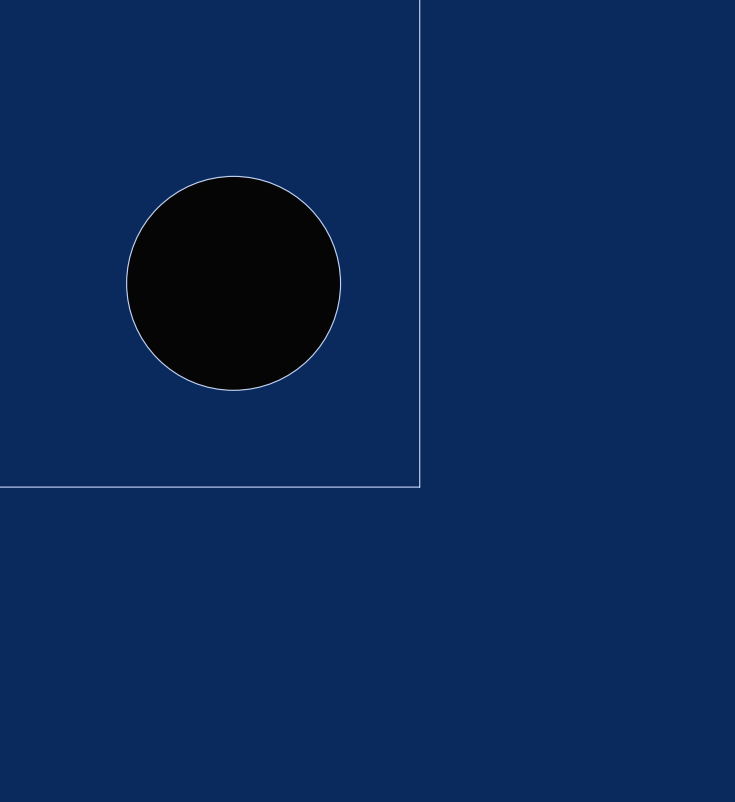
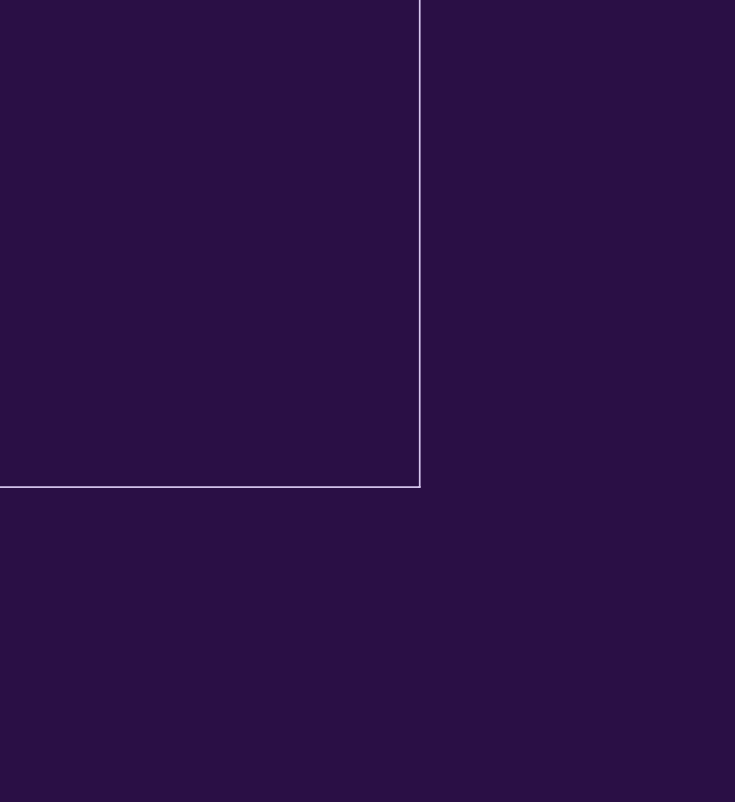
hole: (233, 283) -> none

